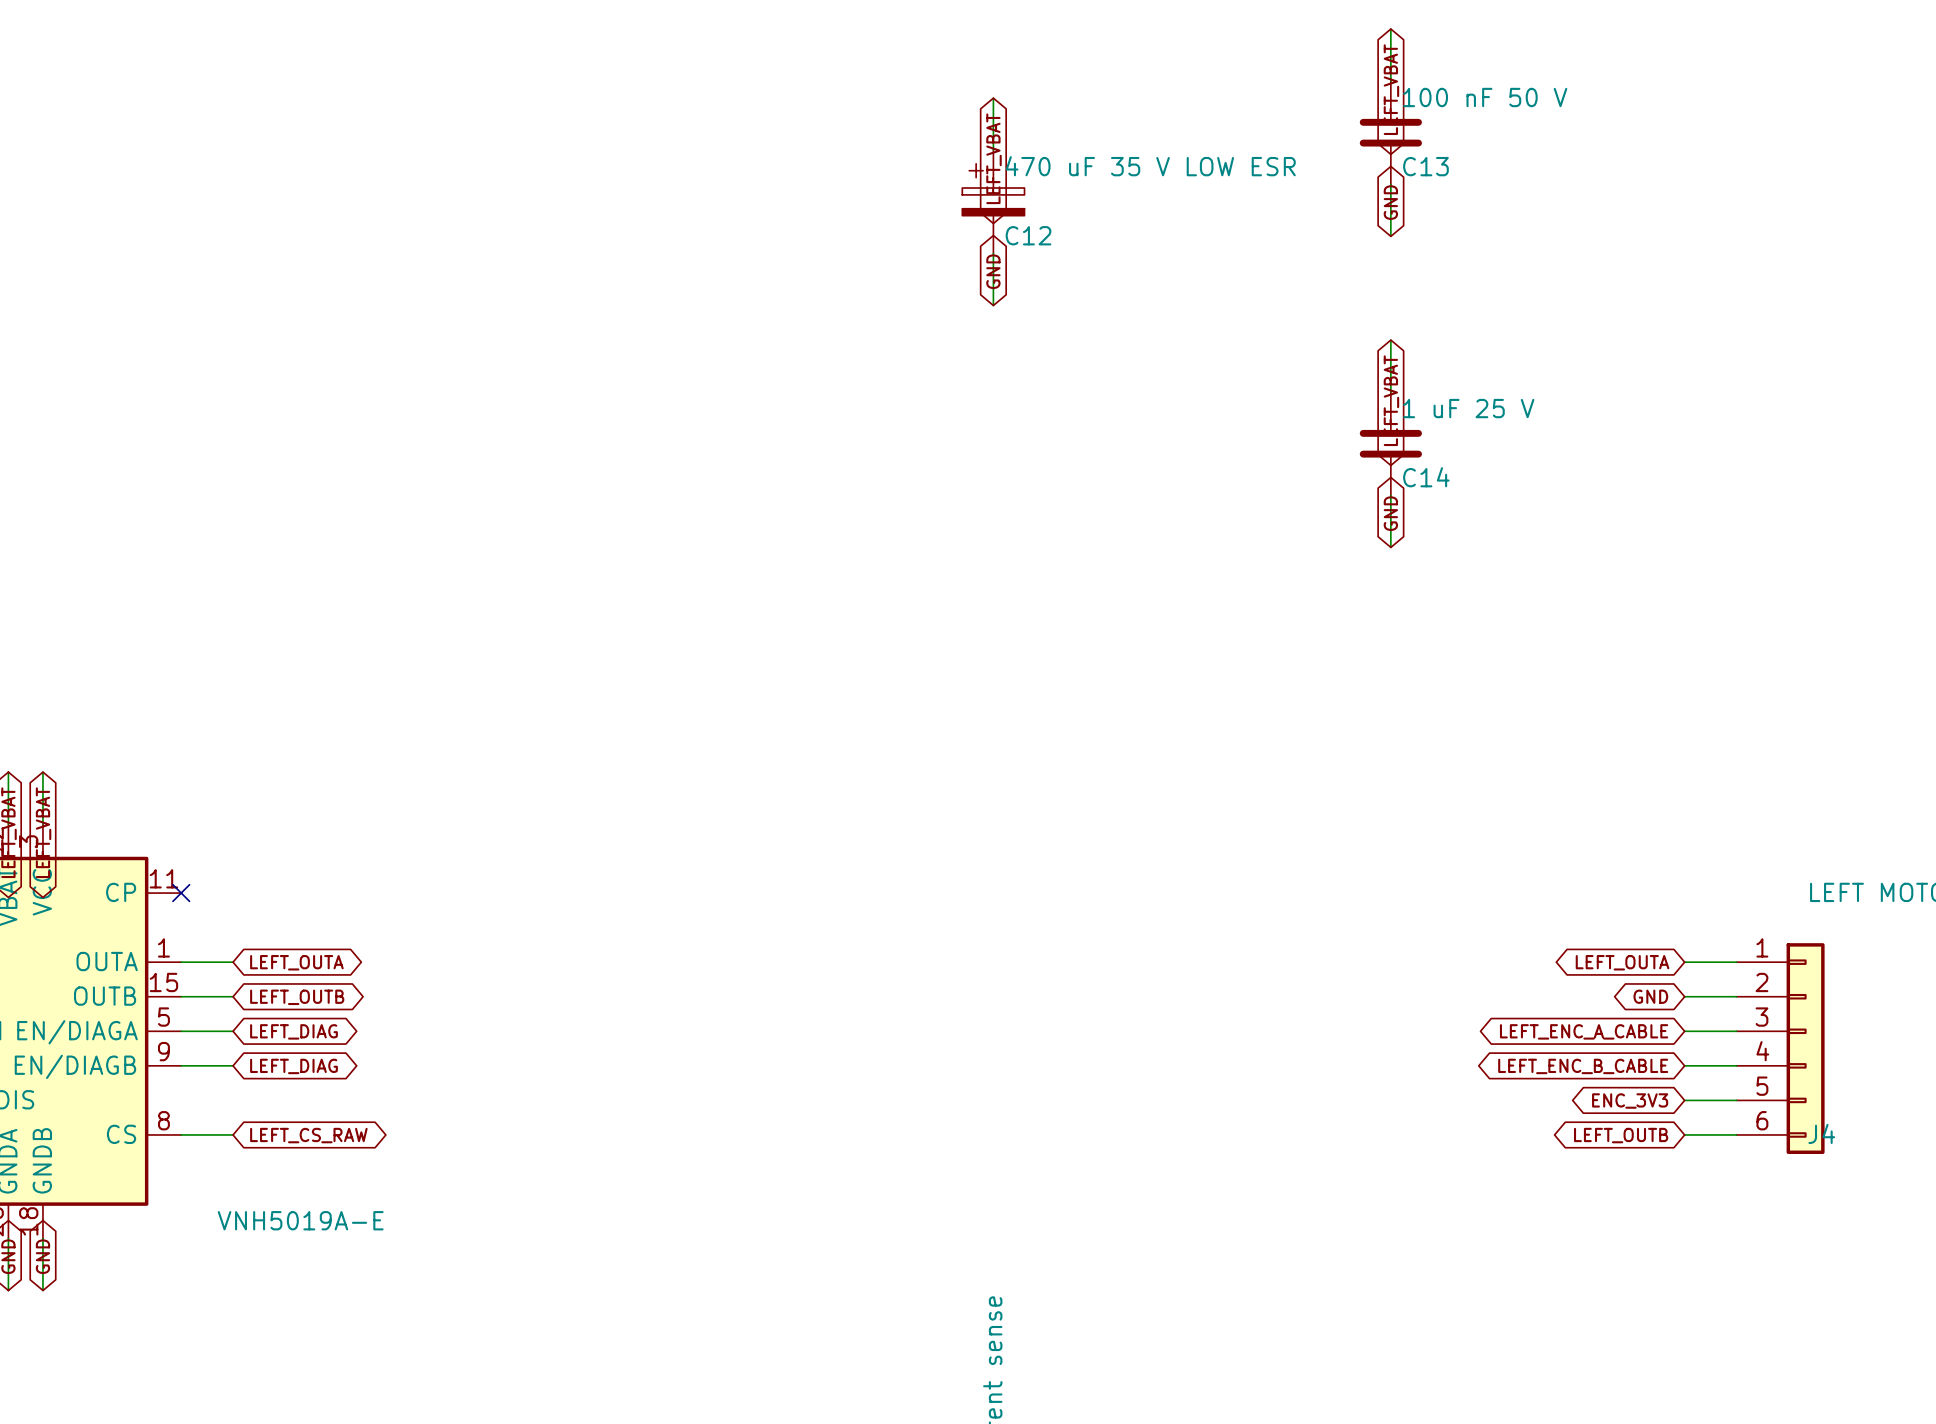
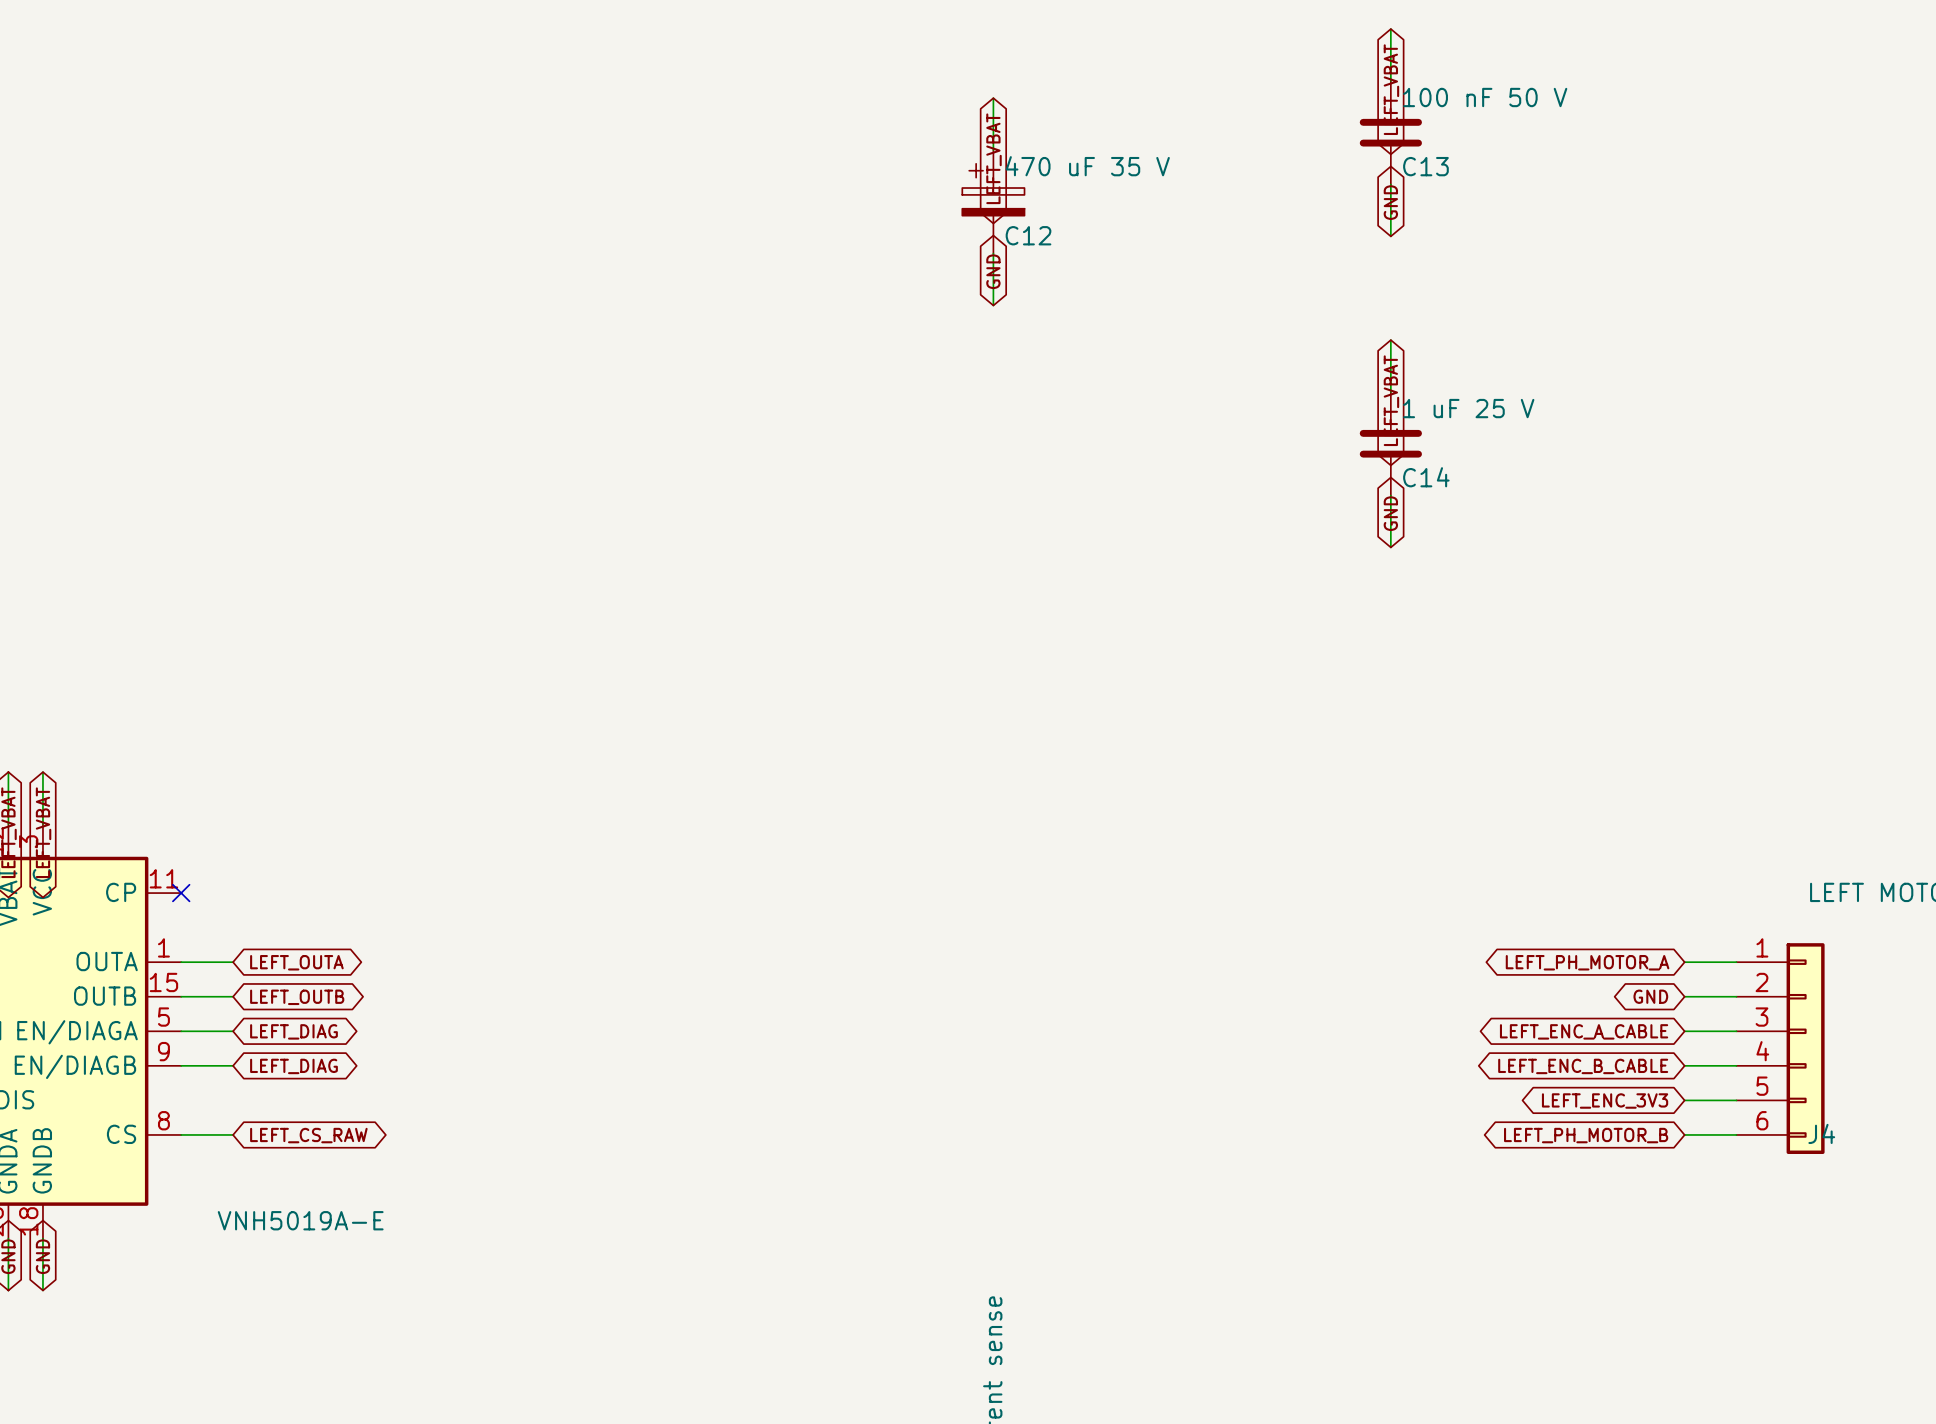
C12 value: 470 uF 35 V LOW ESR (1150, 166) -> 470 uF 35 V (1087, 166)
global label: LEFT_OUTA (1622, 962) -> LEFT_PH_MOTOR_A (1587, 962)
global label: ENC_3V3 (1630, 1101) -> LEFT_ENC_3V3 (1605, 1101)
global label: LEFT_OUTB (1621, 1135) -> LEFT_PH_MOTOR_B (1586, 1135)

